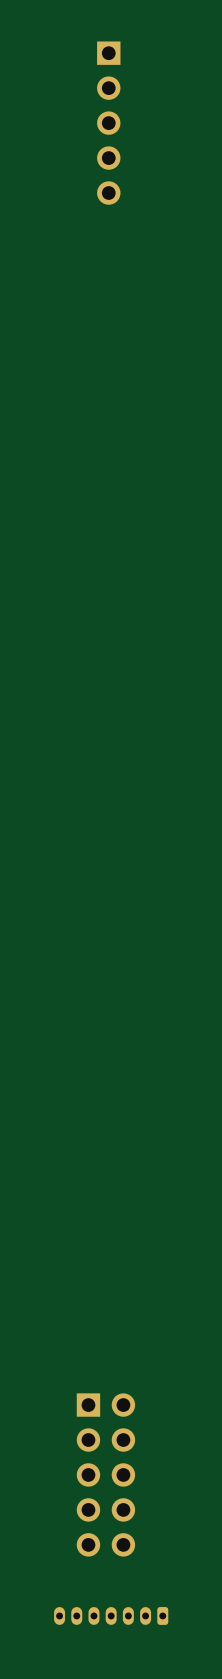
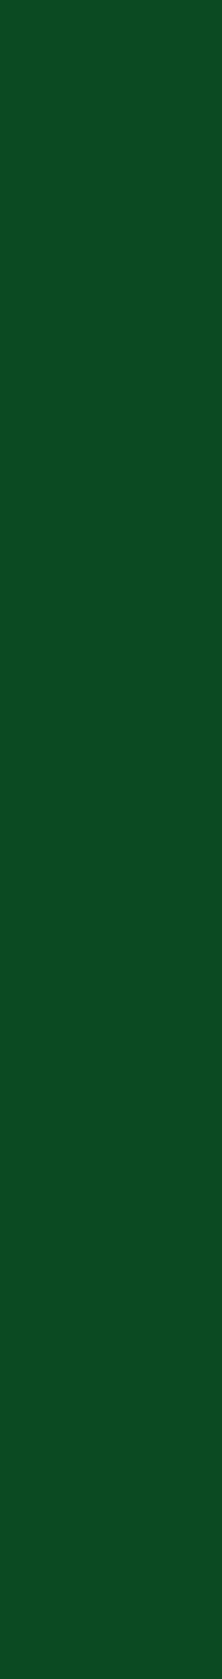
part: (108, 123) -> none
part: (105, 1474) -> none
part: (111, 1615) -> none

